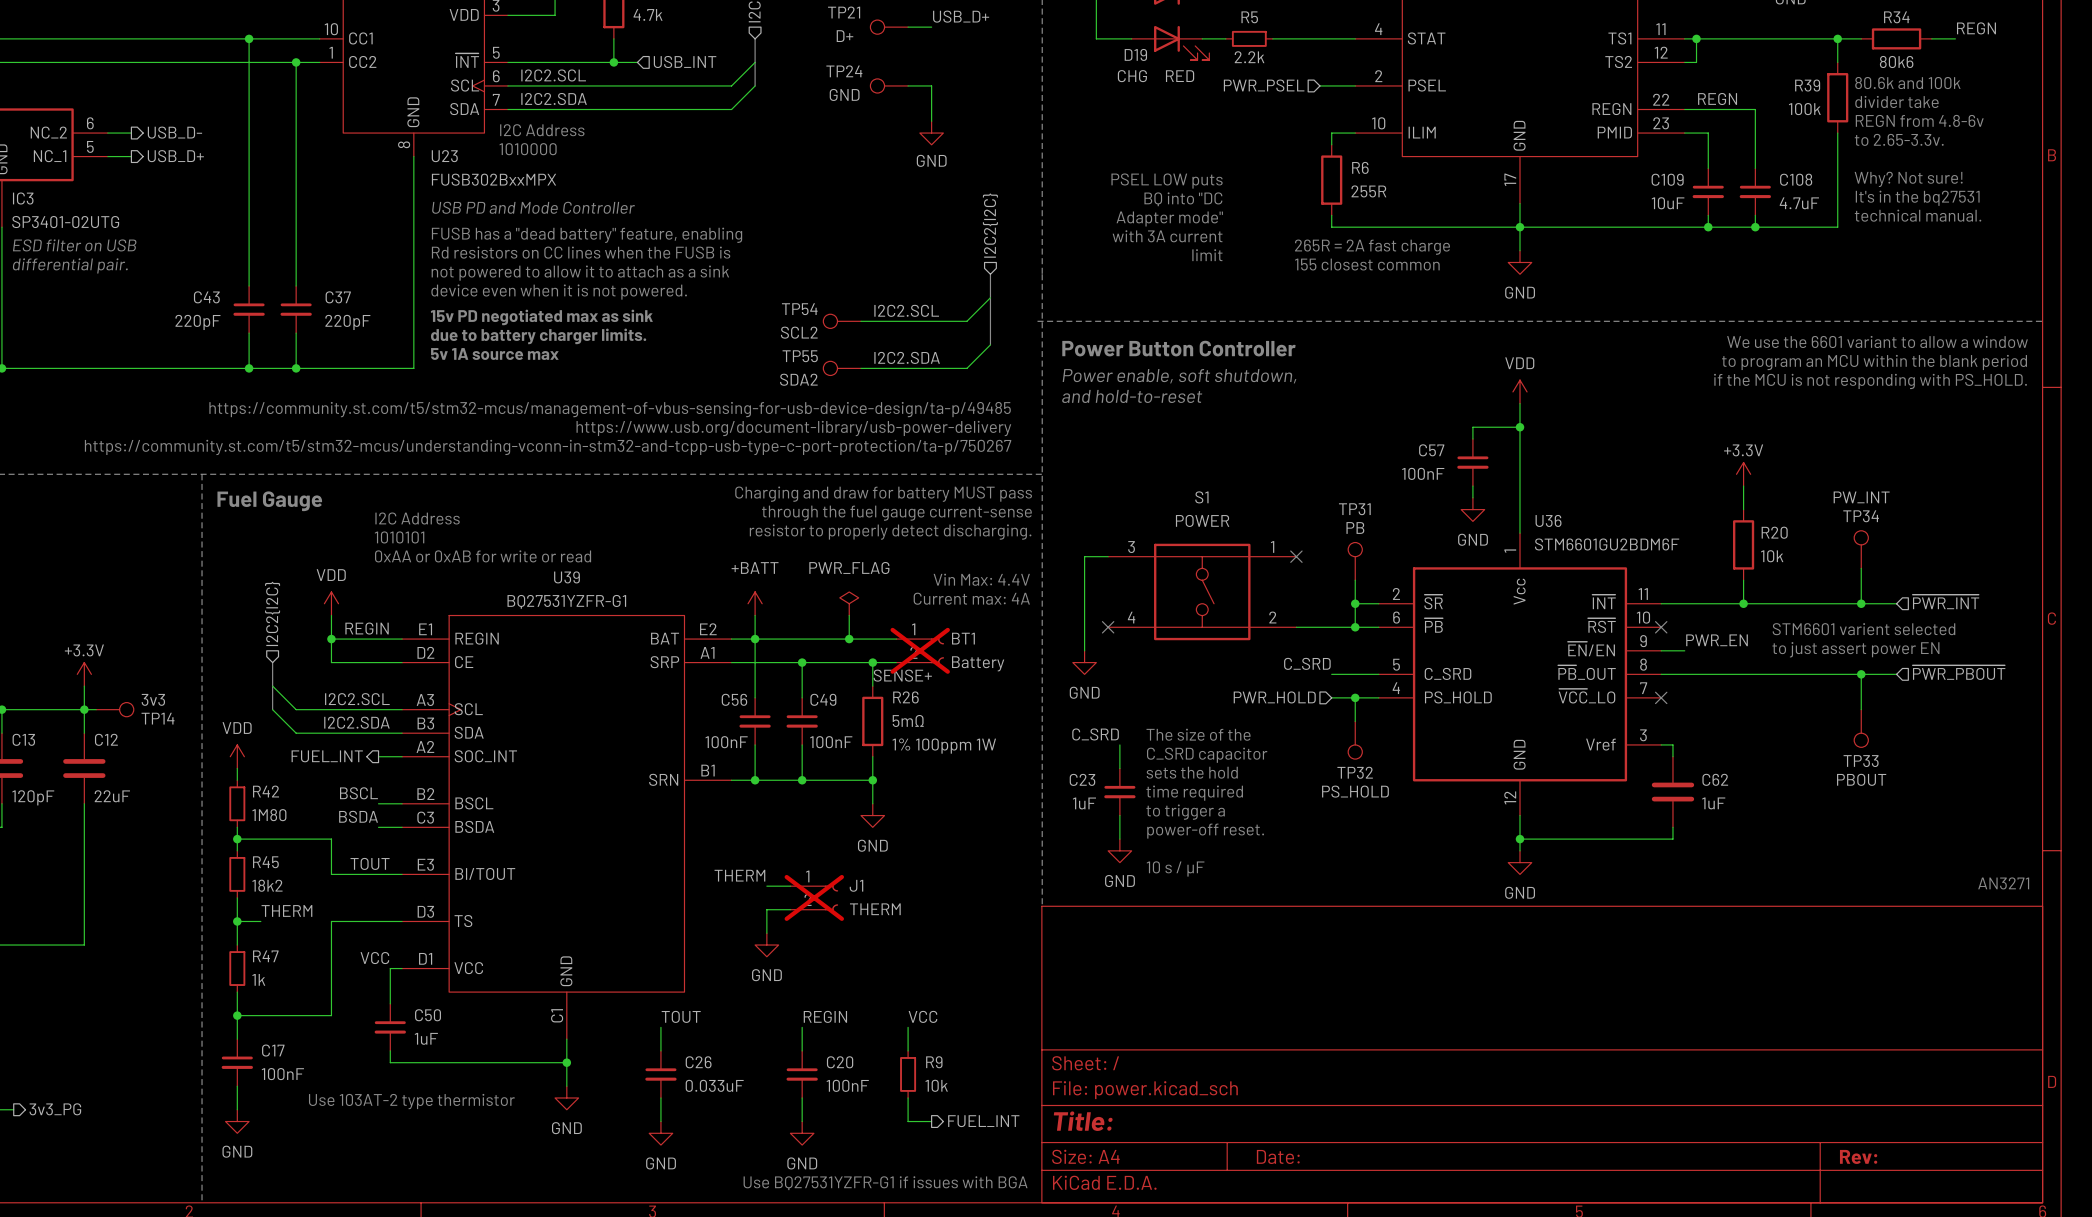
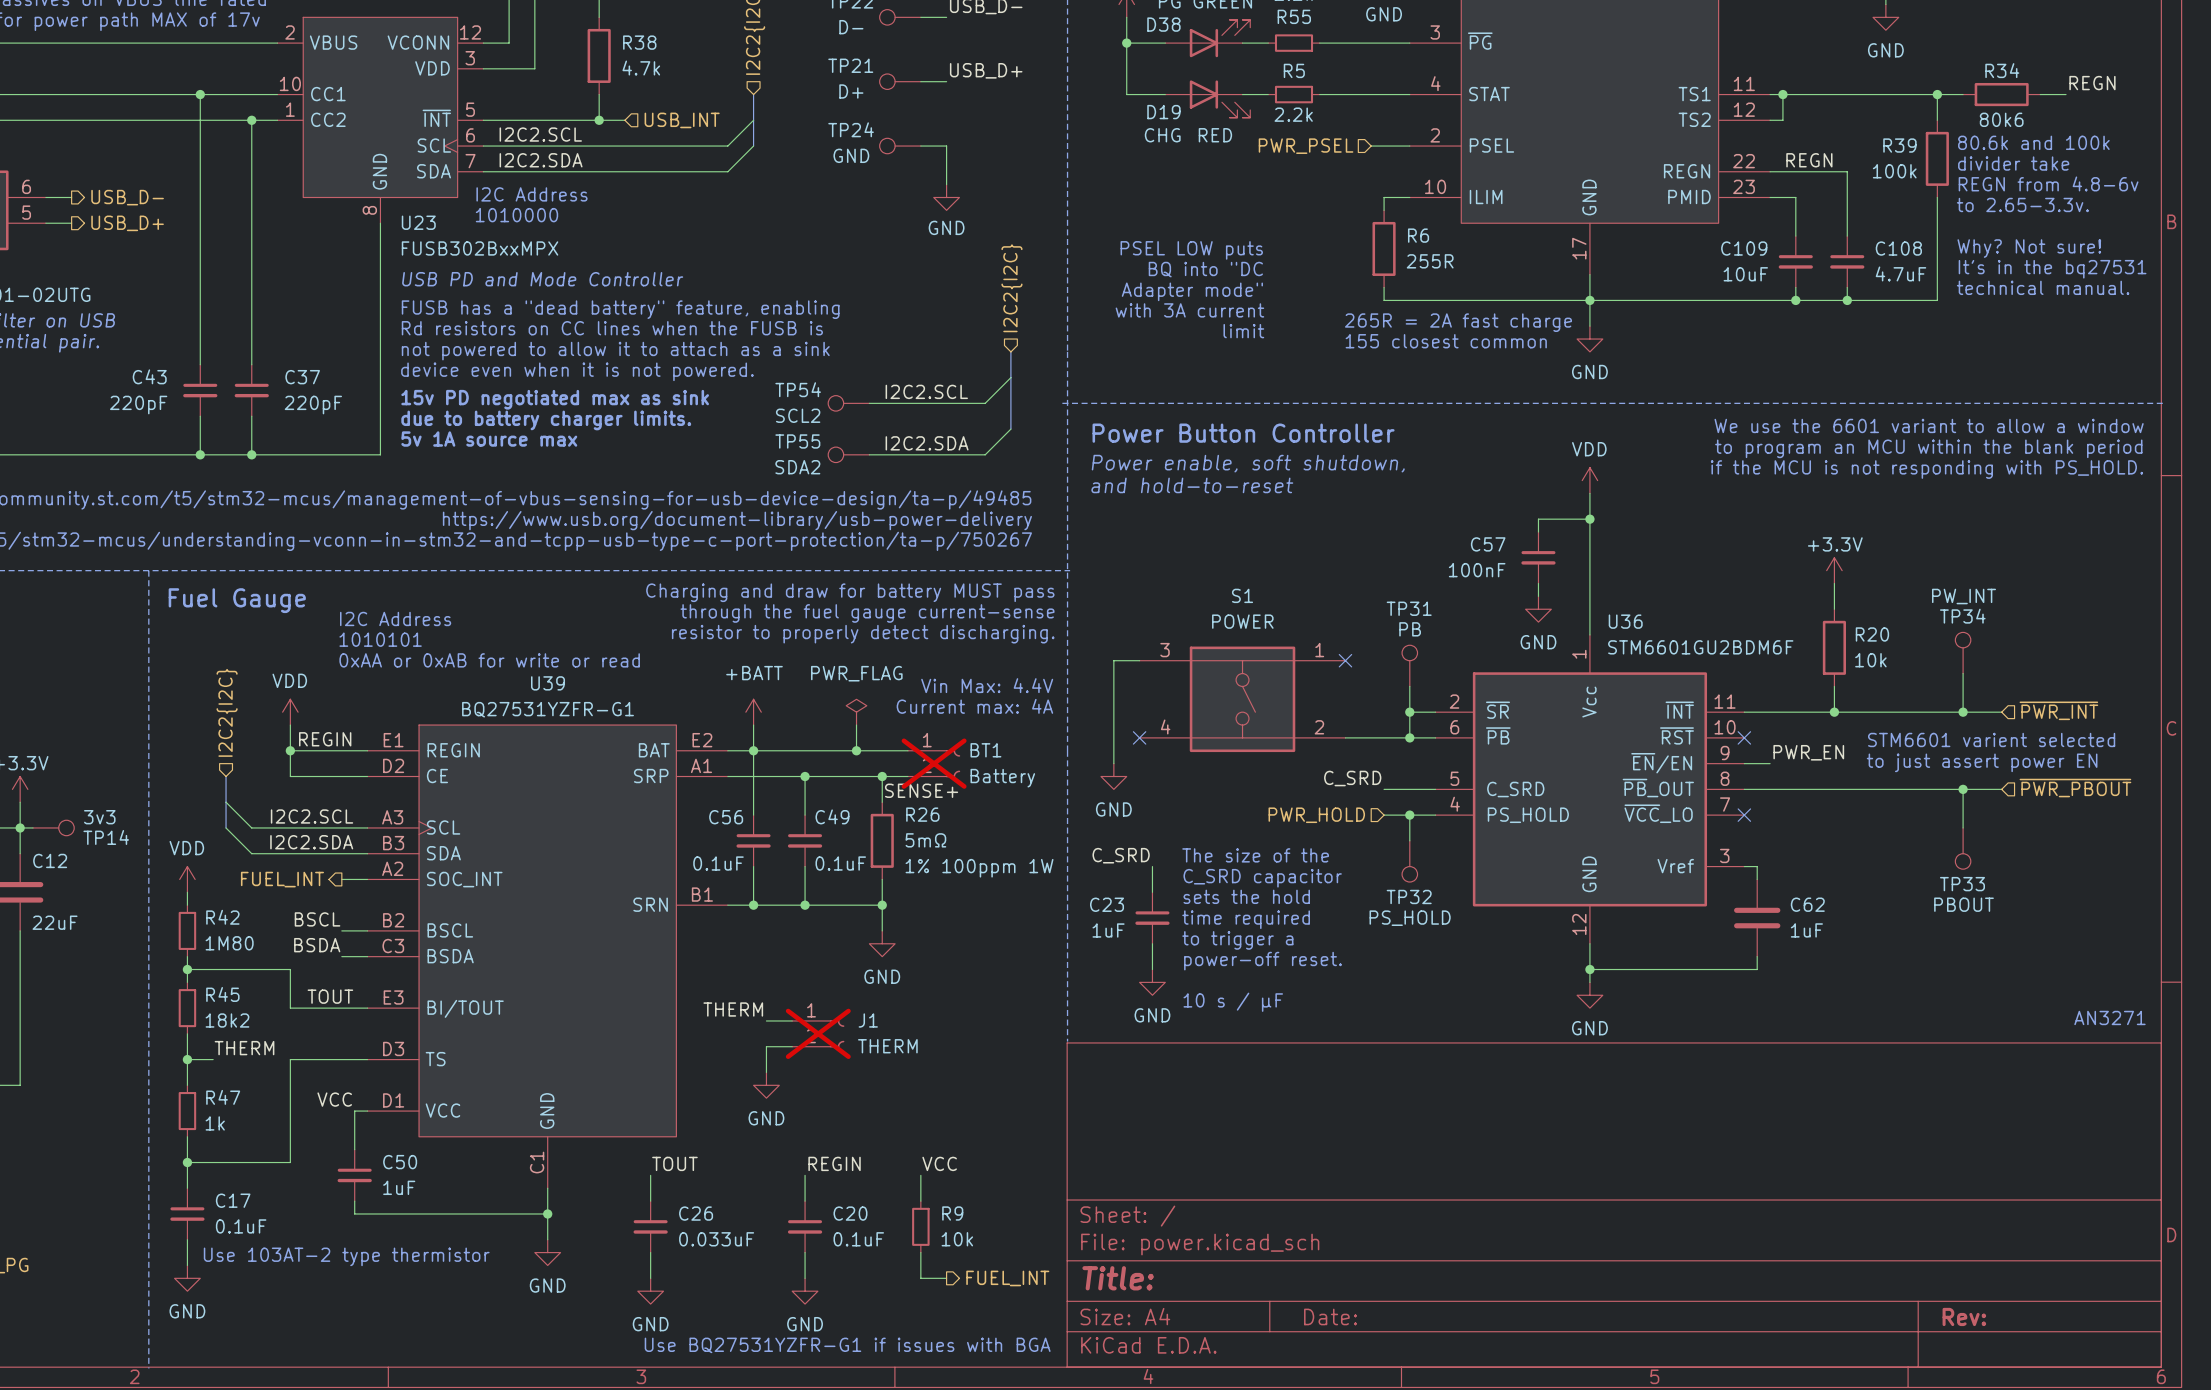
C56 value: 100nF (726, 742) -> 0.1uF (718, 863)
C49 value: 100nF (831, 742) -> 0.1uF (840, 863)
C17 value: 100nF (282, 1074) -> 0.1uF (241, 1226)
C20 value: 100nF (847, 1085) -> 0.1uF (858, 1239)

